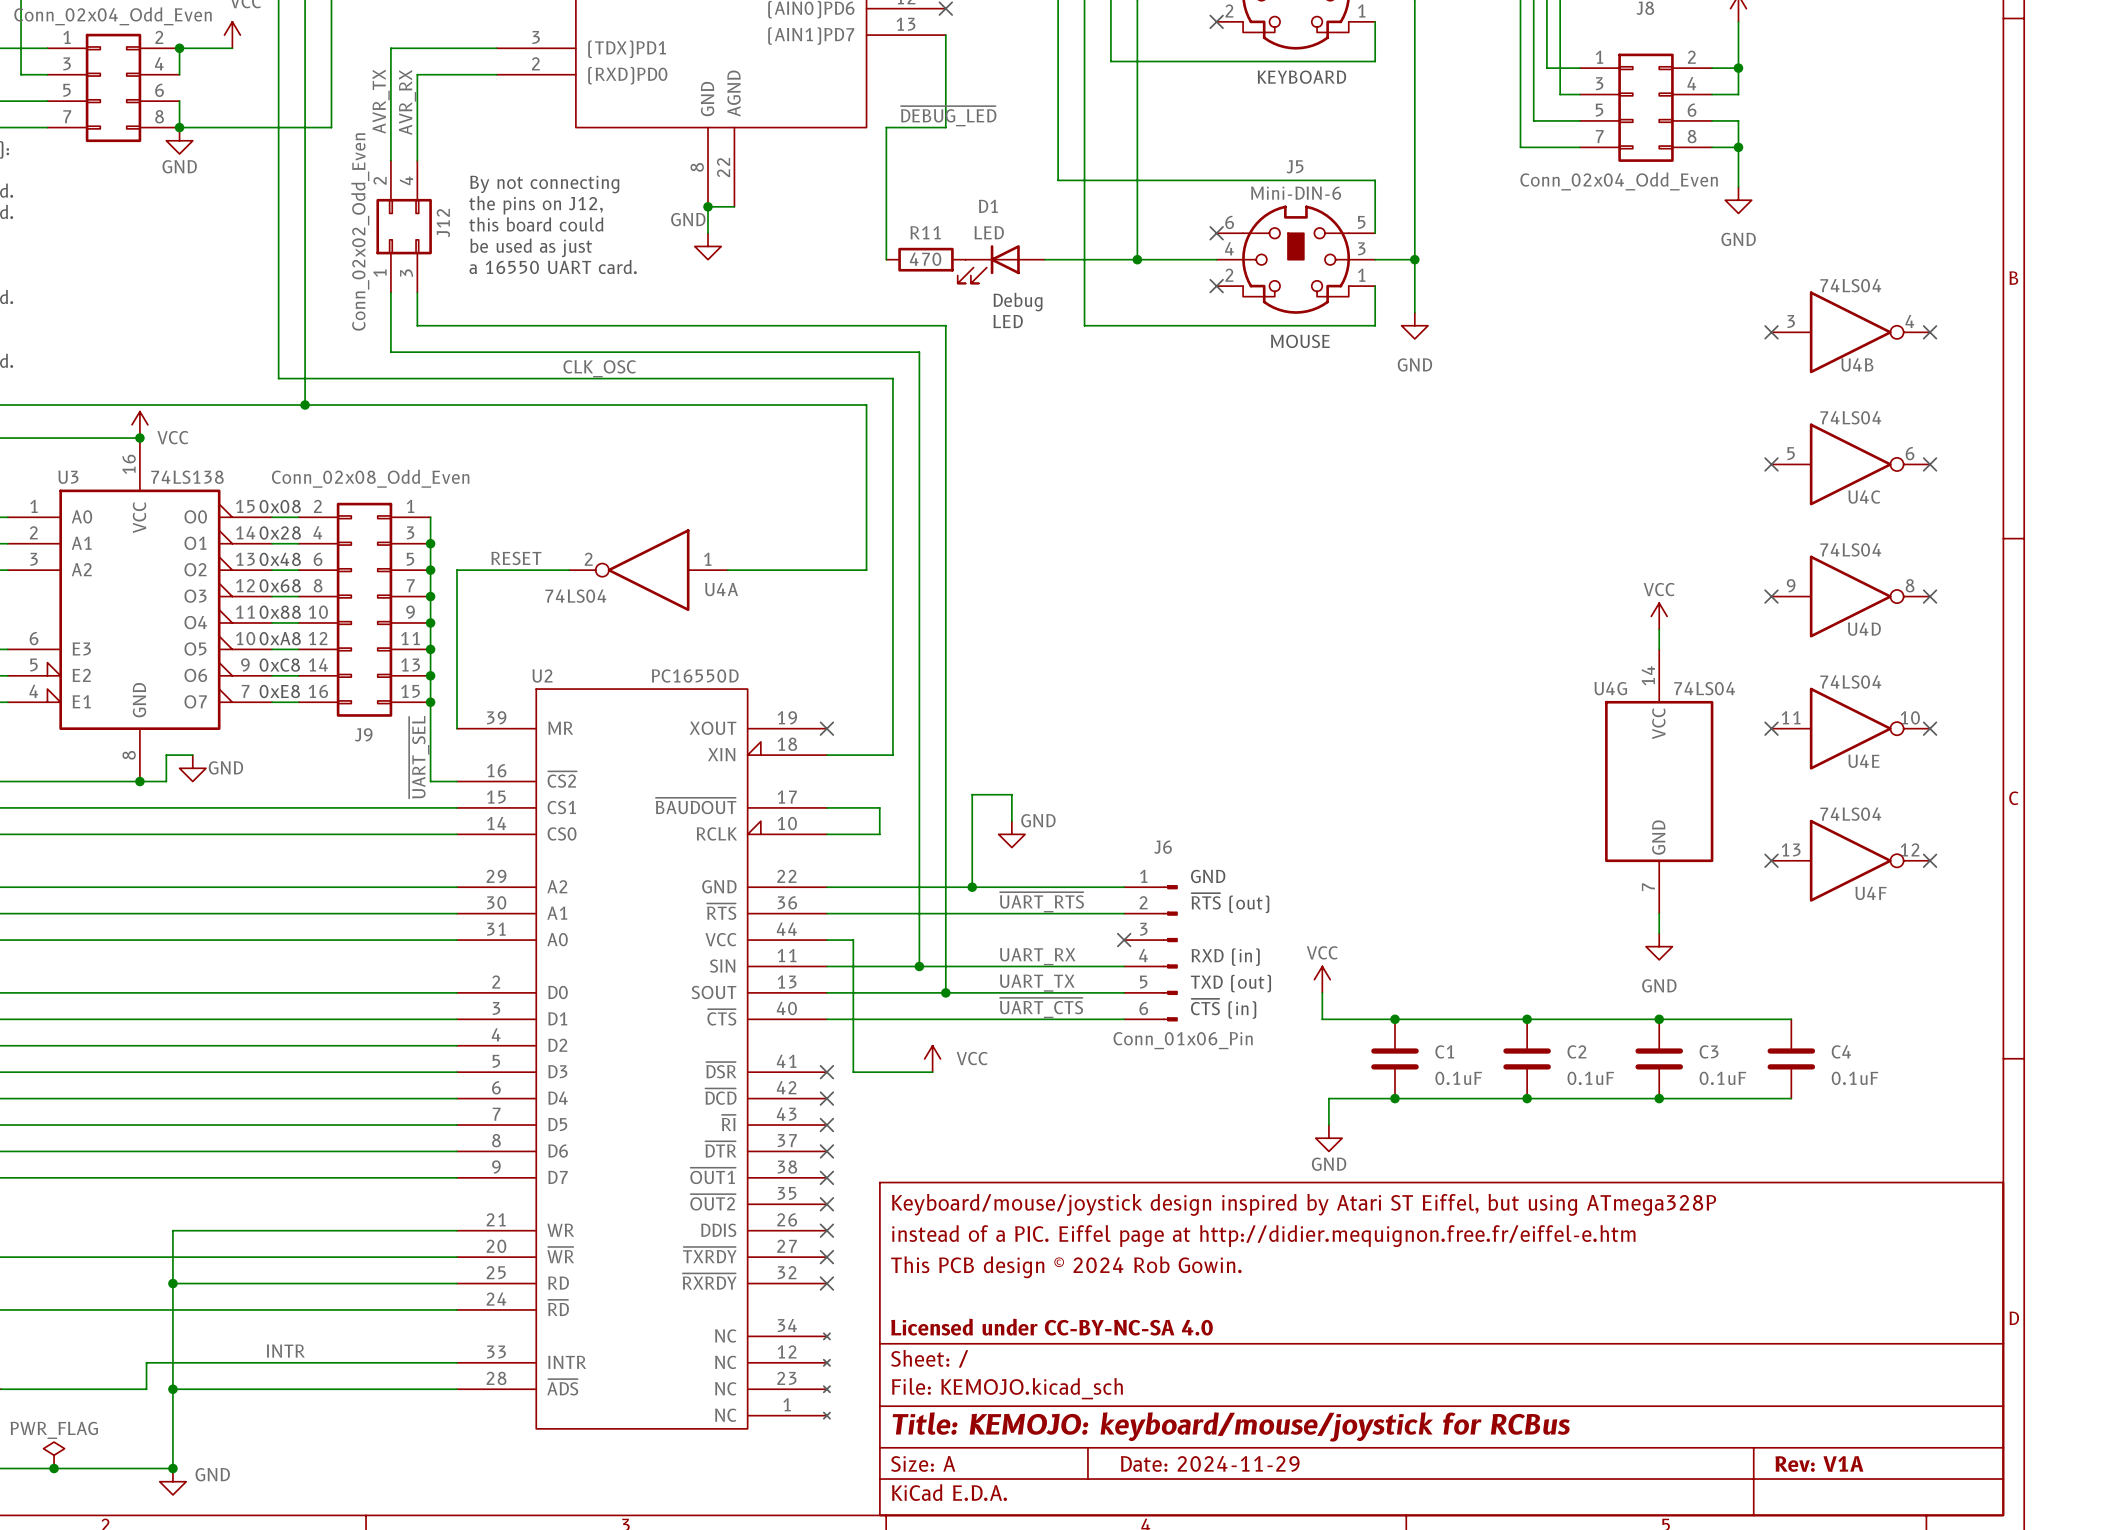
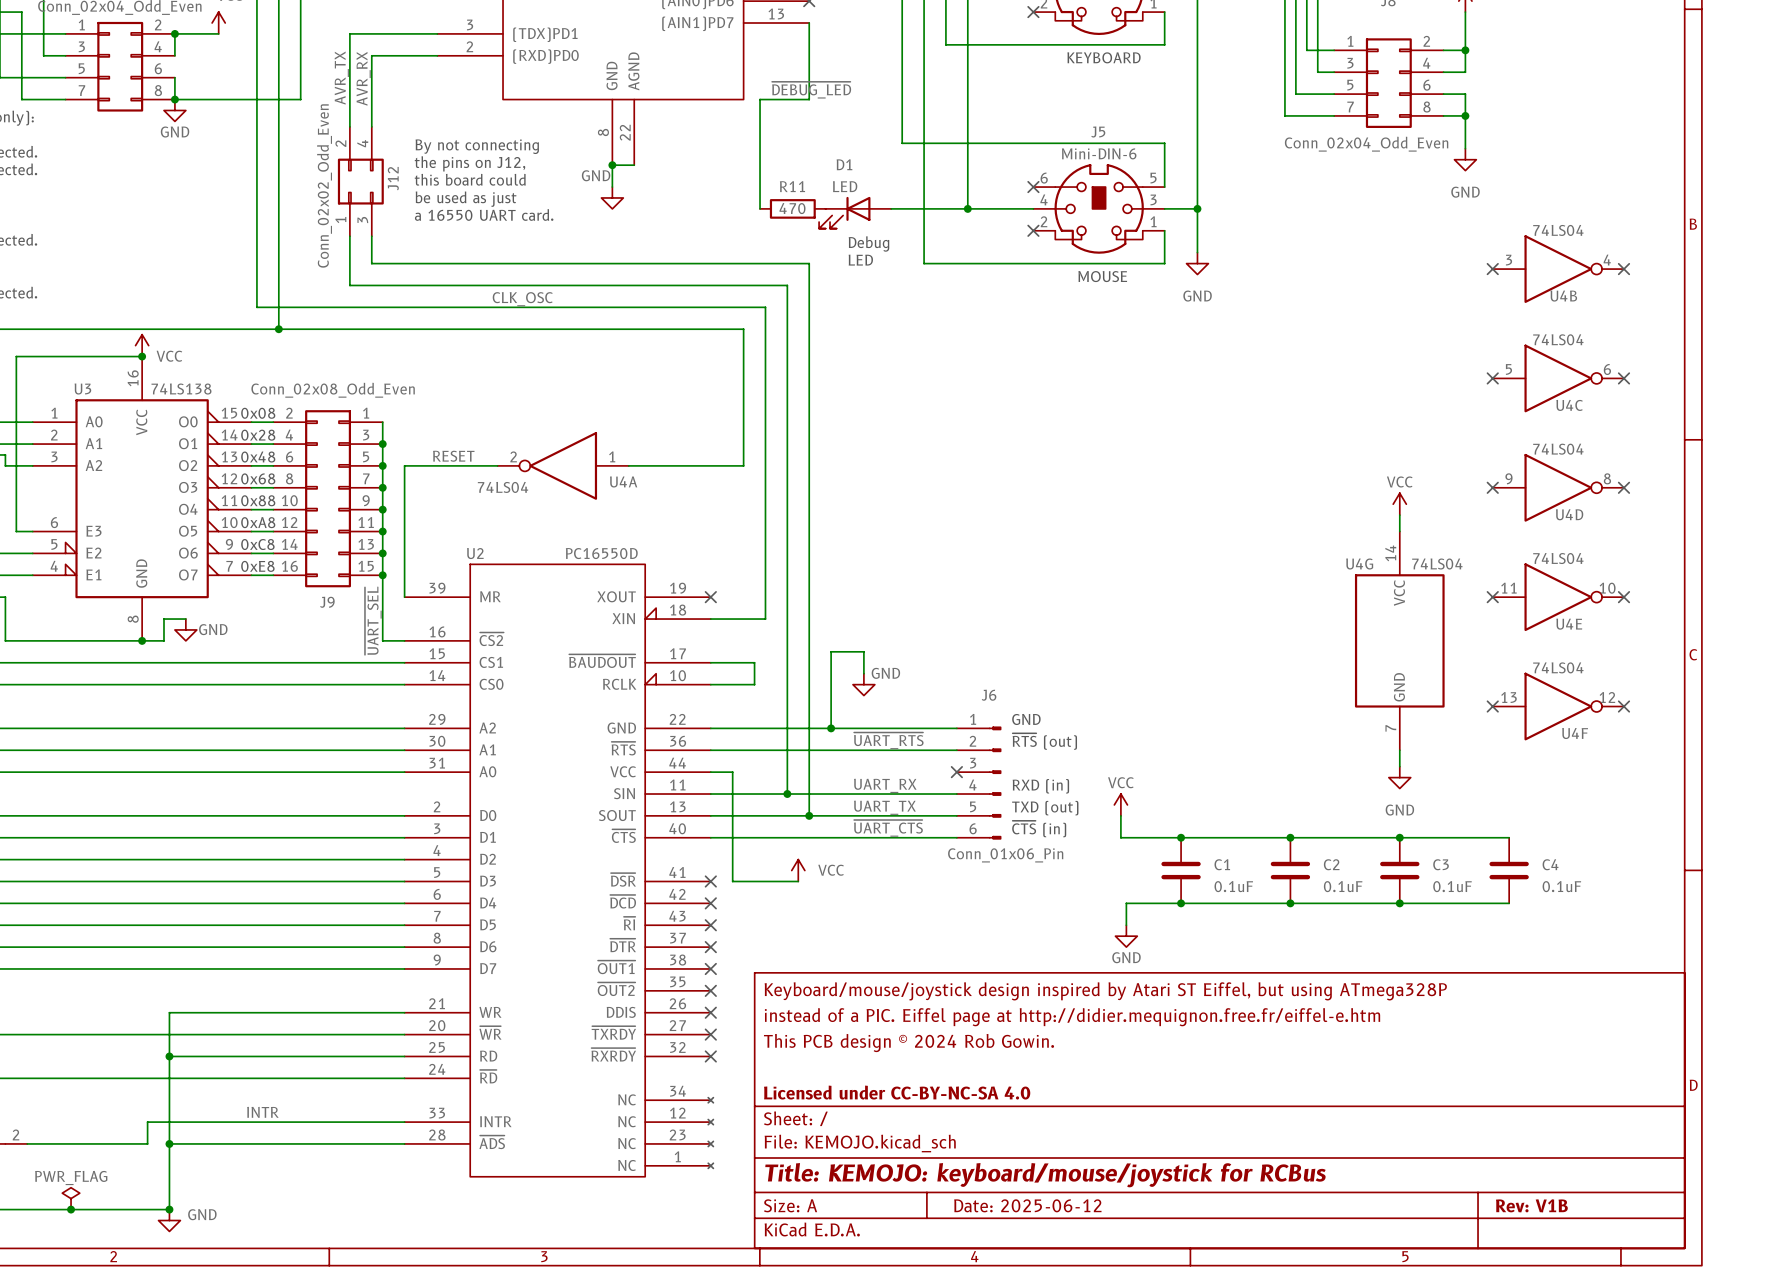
title block: Date: 2024-11-29 (1210, 1463) -> Date: 2025-06-12 (1027, 1205)
title block: Rev: V1A (1819, 1464) -> Rev: V1B (1531, 1205)

